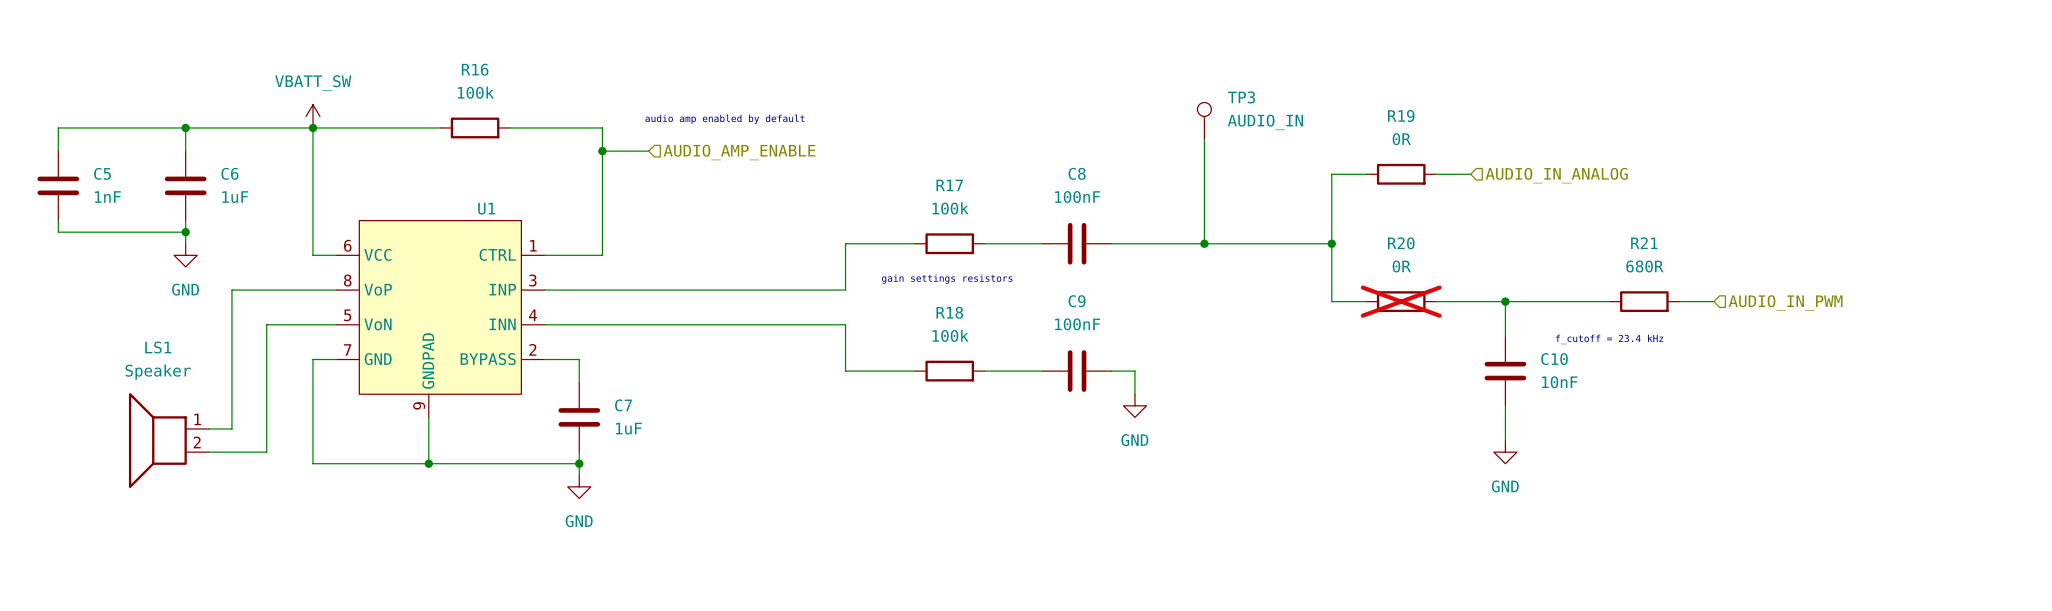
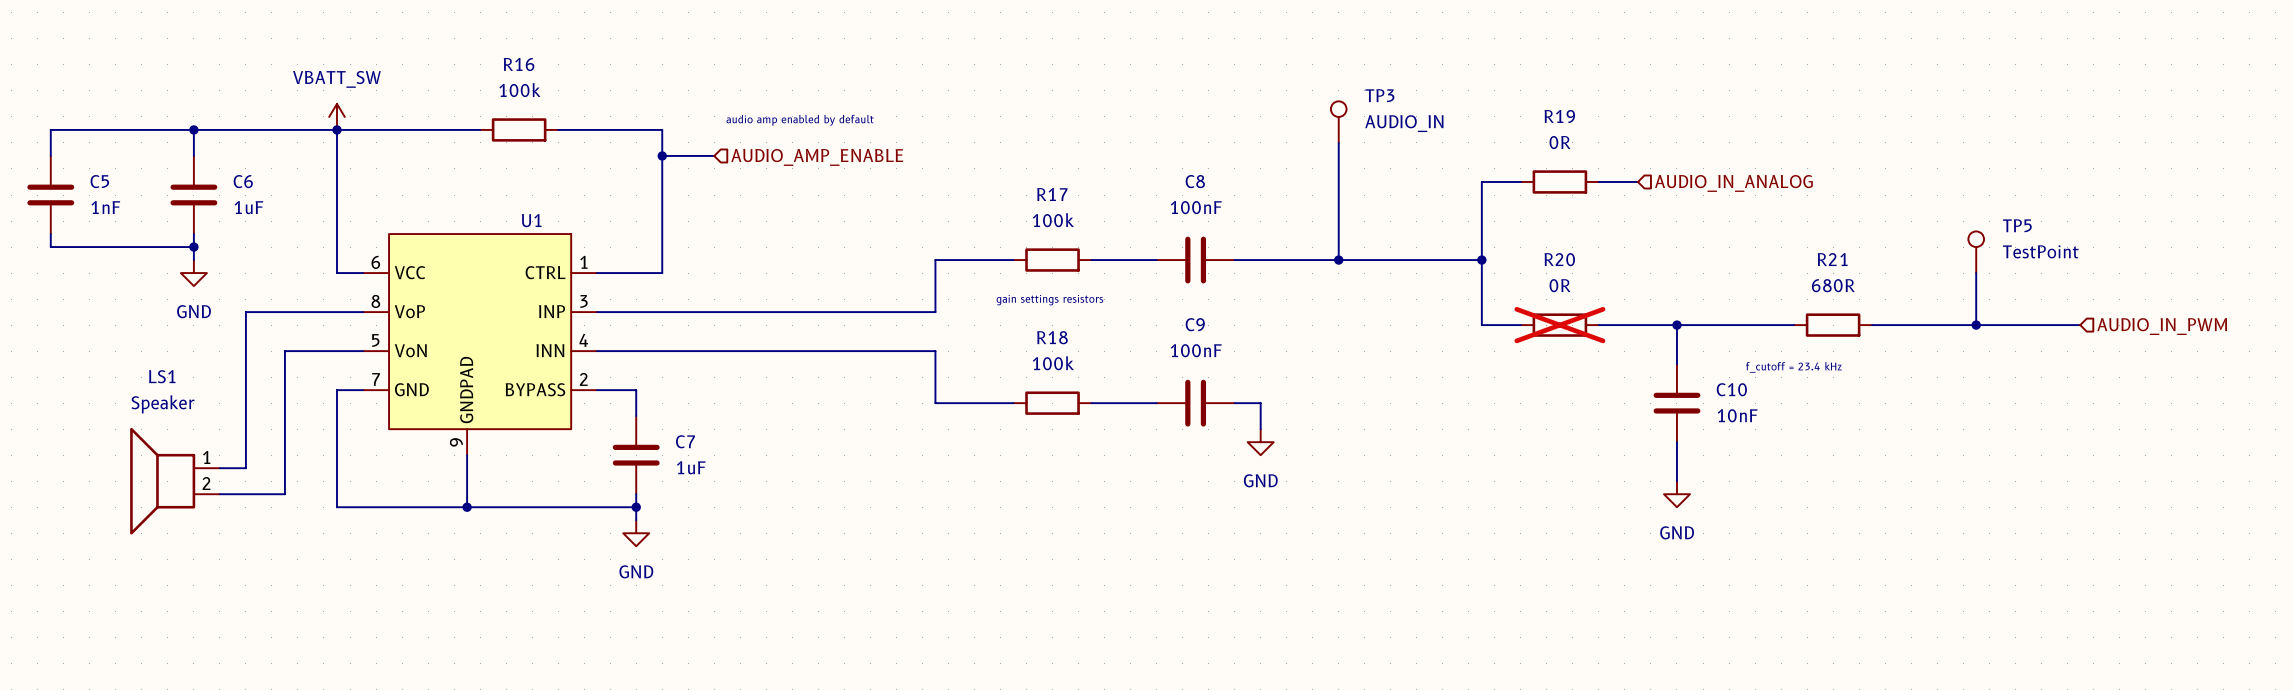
TP5: none -> TestPoint (1976, 252)
wire: none -> (1976, 273) (1976, 325)
wire: none -> (1911, 325) (2080, 325)
junction: none -> (1976, 325)
hierarchical label position: AUDIO_IN_PWM (1785, 302) -> AUDIO_IN_PWM (2162, 326)

